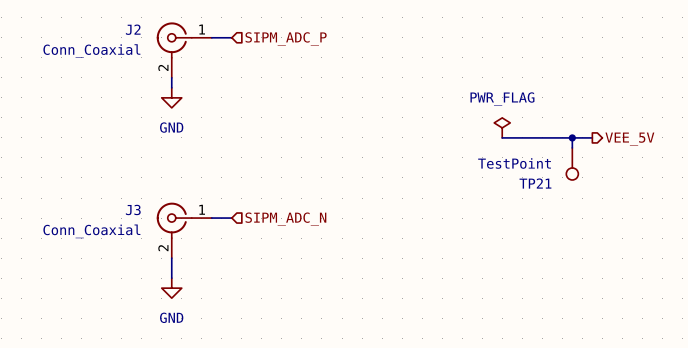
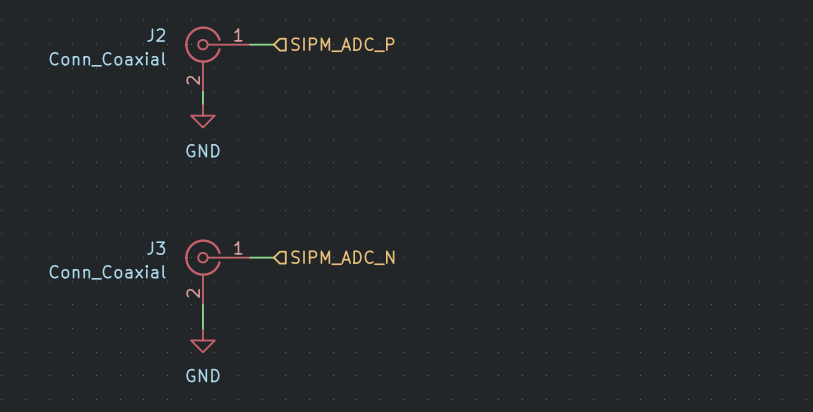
power symbol: PWR_FLAG (502, 127) -> none
wire: (502, 137) (592, 137) -> none
wire: (572, 137) (572, 147) -> none
junction: (572, 137) -> none
hierarchical label: VEE_5V (629, 139) -> none
TP21: TestPoint (572, 163) -> none

